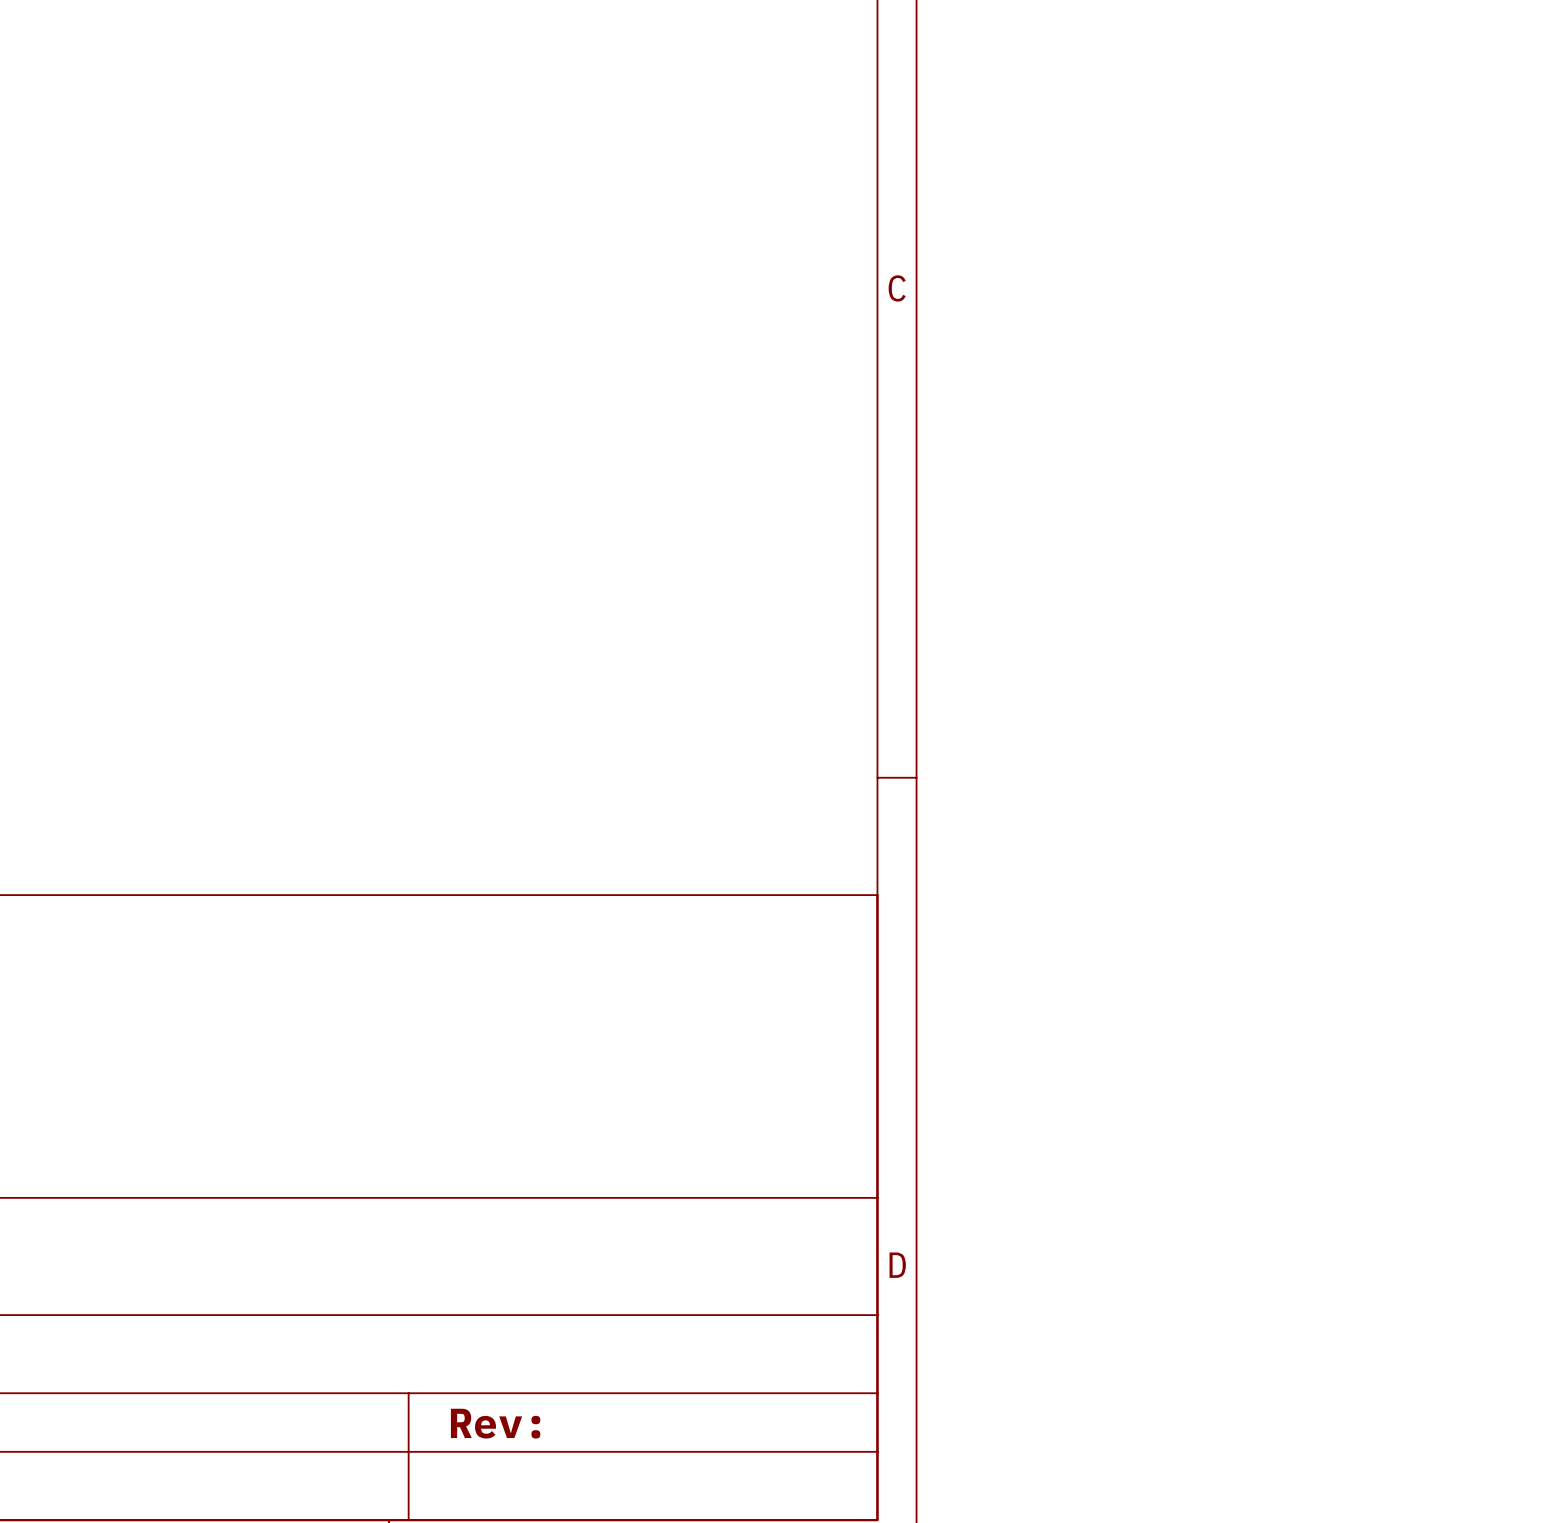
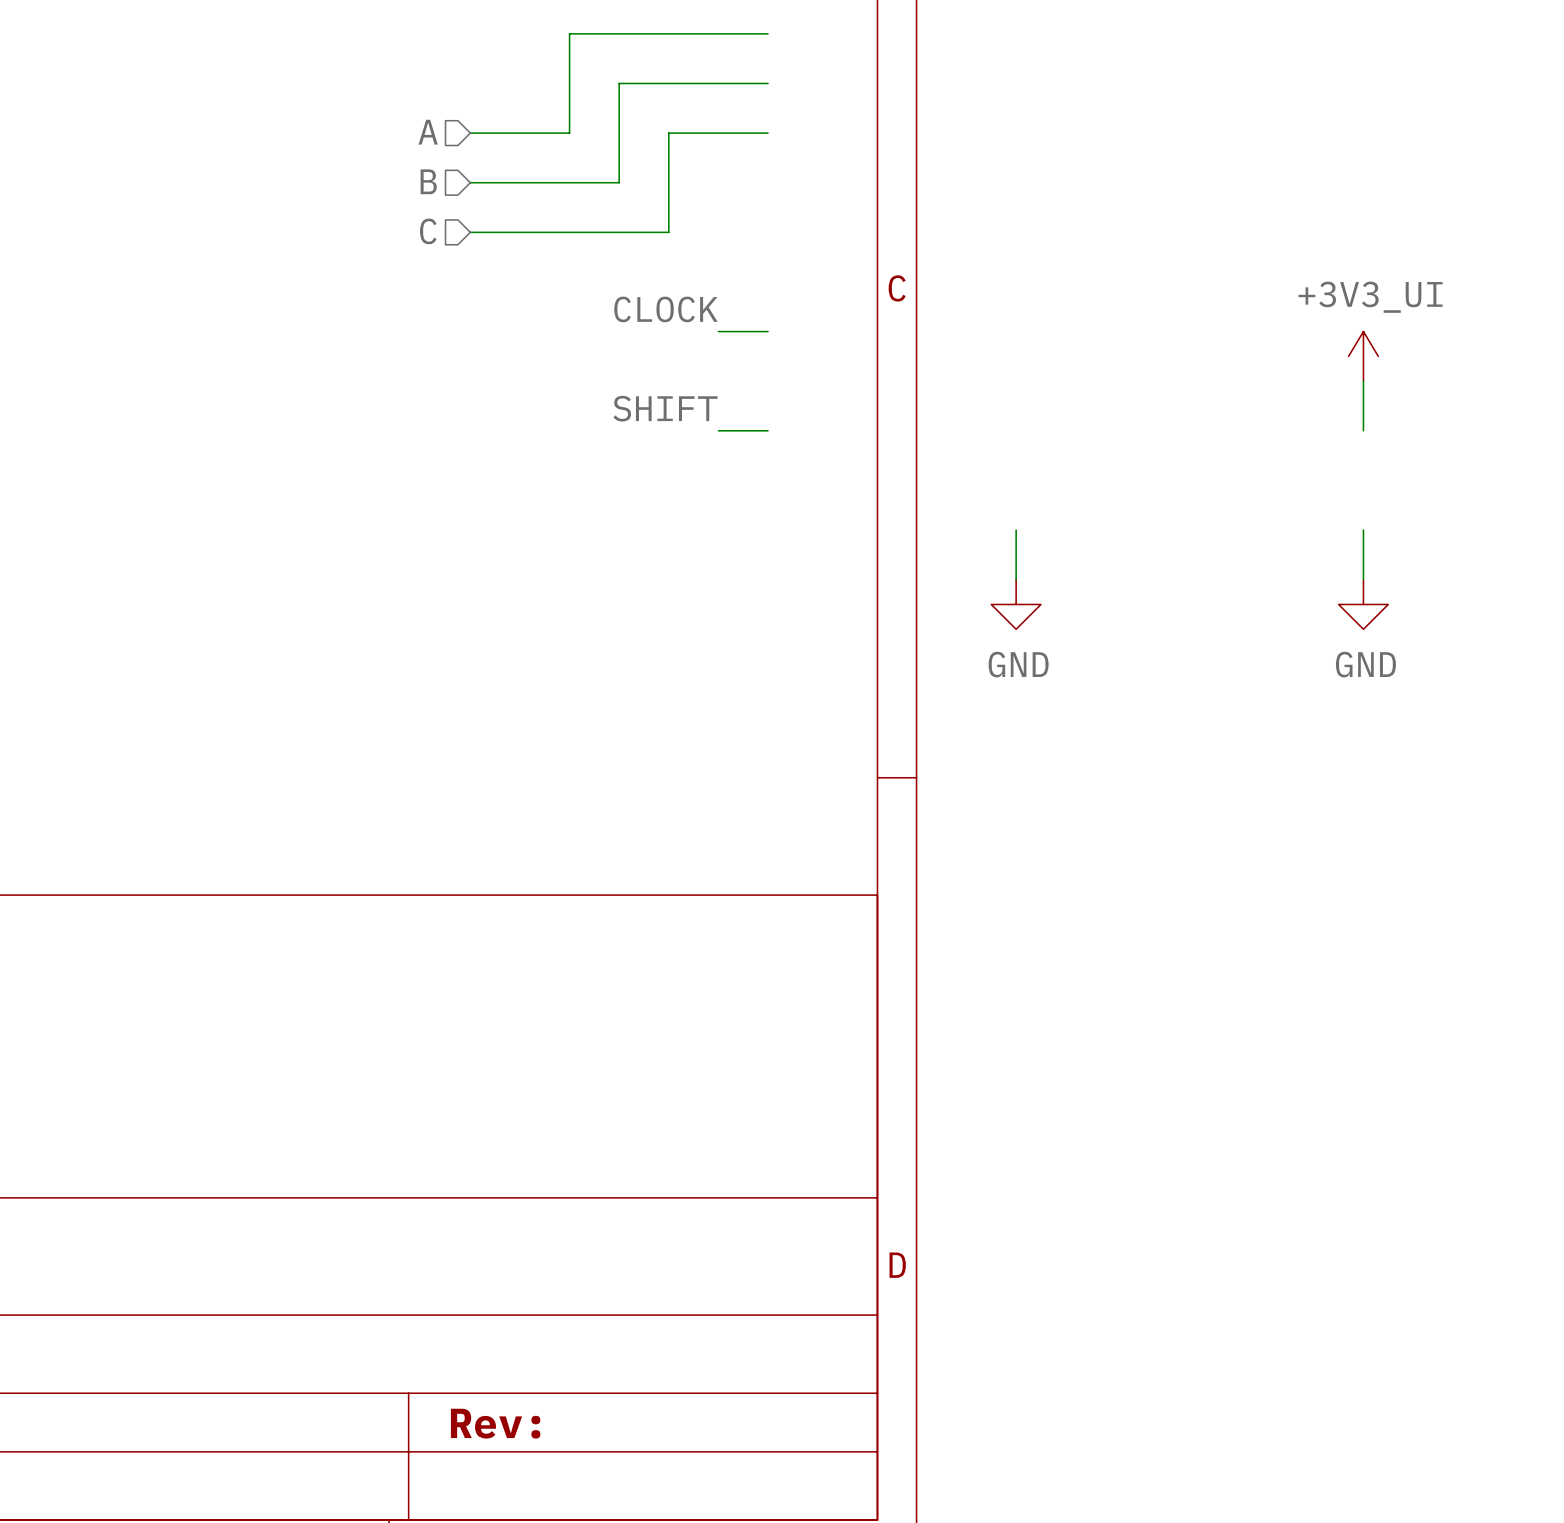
wire: none -> (768, 33) (569, 33) (569, 133) (470, 133)
wire: none -> (768, 83) (619, 83) (619, 182) (470, 182)
sheet pin: none -> A (428, 132)
wire: none -> (768, 133) (668, 133) (668, 232) (470, 232)
sheet pin: none -> B (428, 181)
sheet pin: none -> C (428, 231)
label: none -> CLOCK (665, 309)
wire: none -> (718, 331) (768, 331)
power symbol: none -> +3V3_UI (1363, 356)
wire: none -> (1363, 381) (1363, 430)
label: none -> SHIFT (665, 408)
wire: none -> (718, 430) (768, 430)
wire: none -> (1016, 530) (1016, 579)
wire: none -> (1363, 530) (1363, 579)
power symbol: none -> GND (1016, 604)
power symbol: none -> GND (1363, 604)

